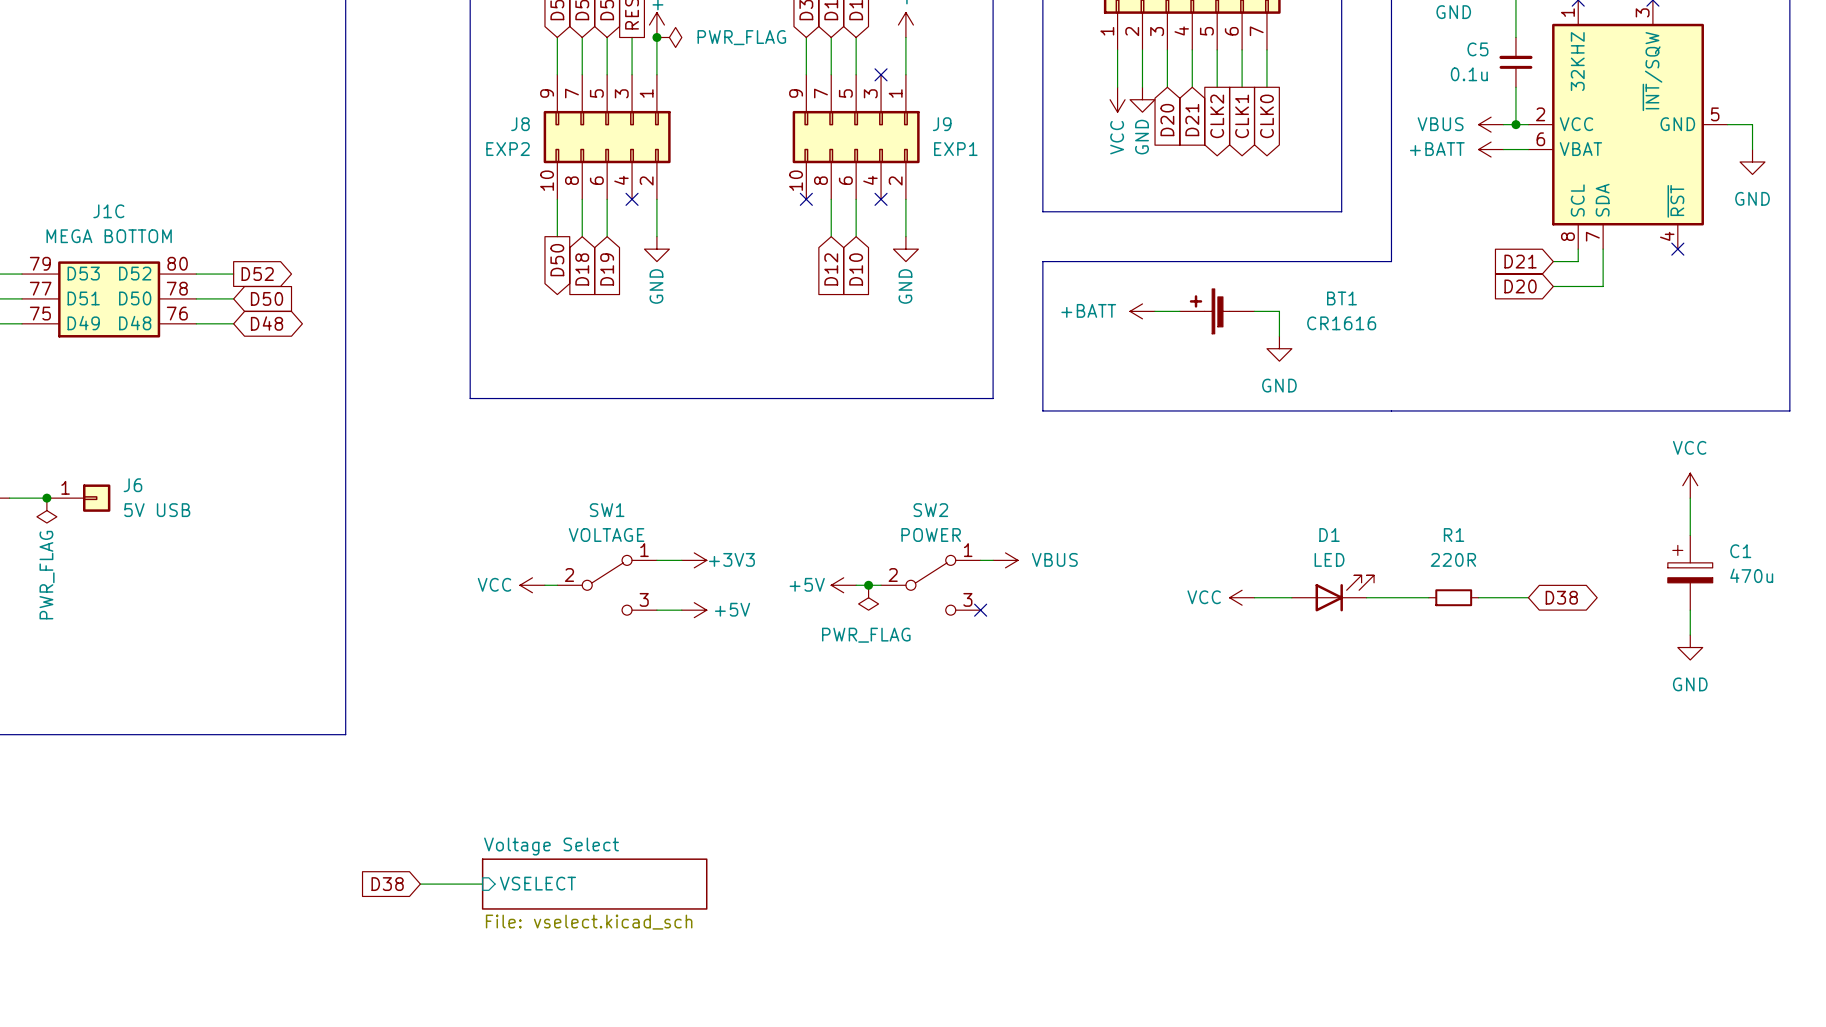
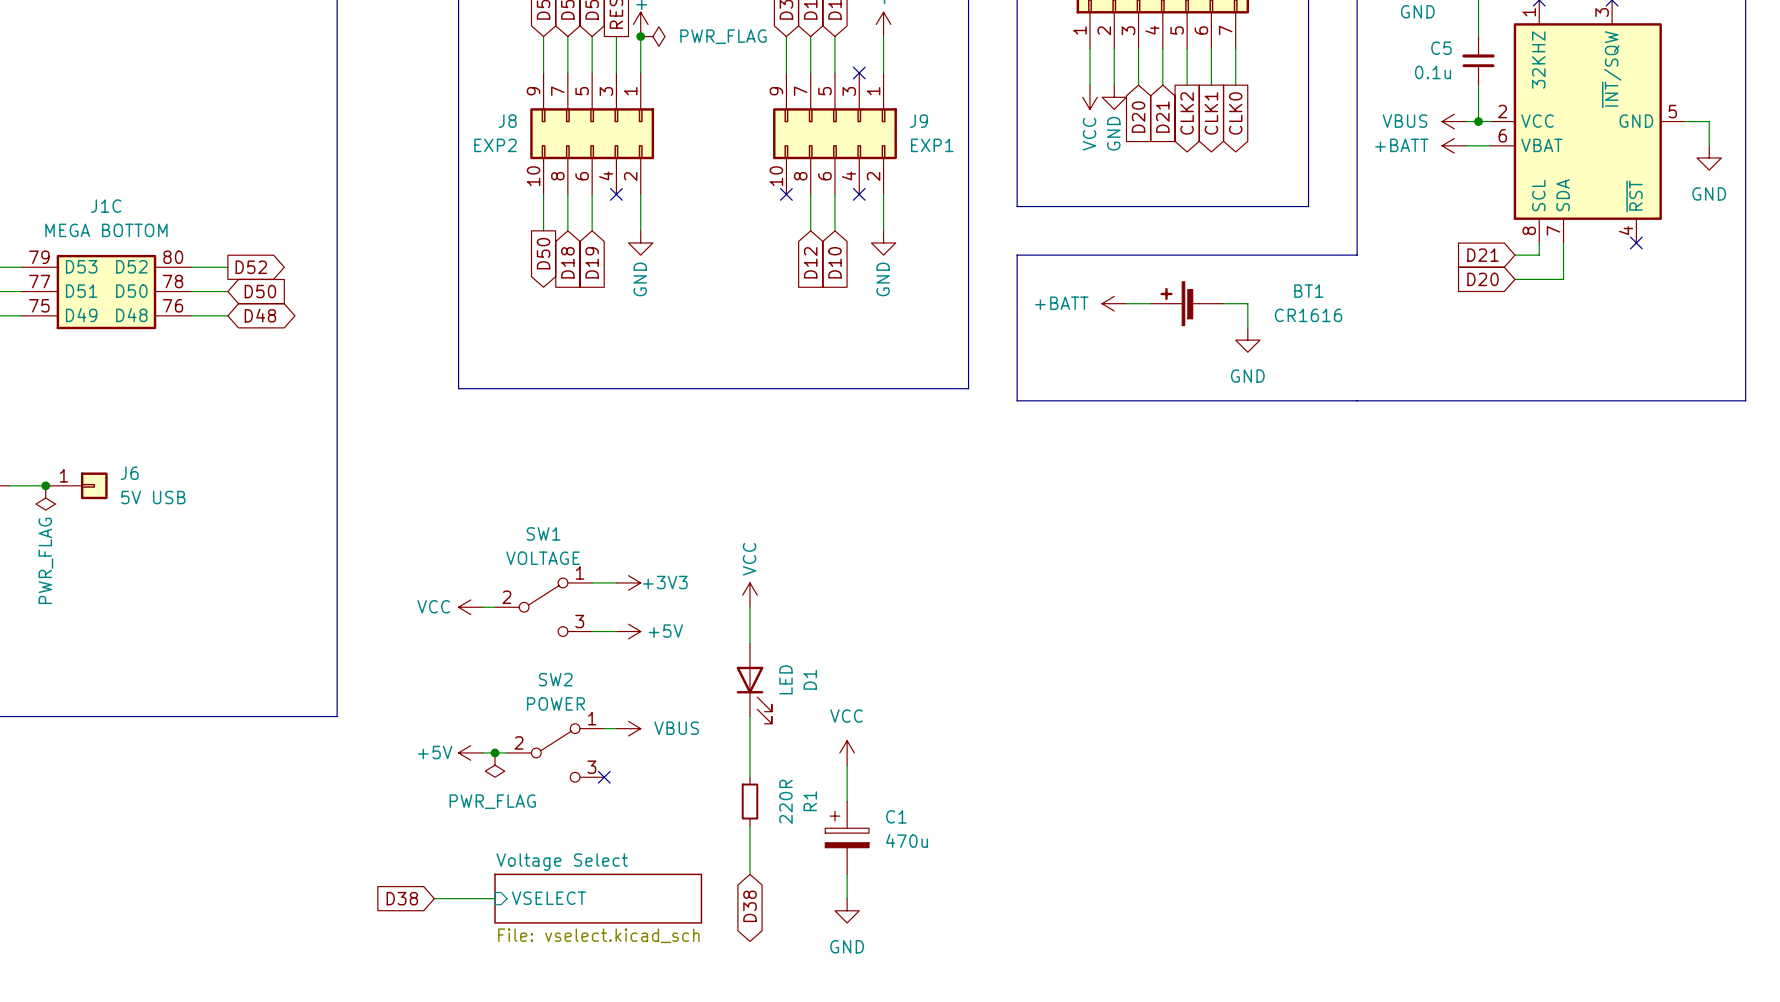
power symbol: VCC (1690, 485) -> none
wire: (1690, 498) (1690, 535) -> none
wire: (656, 560) (681, 560) -> (592, 582) (616, 582)
power symbol position: +3V3 (694, 560) -> +3V3 (628, 582)
wire: (980, 560) (993, 560) -> none
power symbol: VBUS (1005, 560) -> none
C1 position: (1690, 572) -> (847, 837)
power symbol position: VCC (532, 585) -> VCC (470, 607)
wire: (544, 585) (557, 585) -> (482, 607) (495, 607)
SW1 position: (607, 585) -> (543, 607)
power symbol: +5V (843, 585) -> none
wire: (856, 585) (881, 585) -> none
junction: (868, 585) -> none
SW2 position: (930, 585) -> (555, 752)
D1 position: (1332, 593) -> (754, 683)
D1 rotation: 0° (1344, 593) -> 90° clockwise (754, 695)
power symbol: PWR_FLAG (868, 597) -> none
power symbol: VCC (1242, 597) -> none
wire: (1254, 597) (1291, 597) -> none
wire: (1366, 597) (1428, 597) -> none
R1 rotation: 0° (1453, 597) -> 90° clockwise (749, 801)
R1 position: (1453, 597) -> (749, 801)
wire: (1478, 597) (1528, 597) -> none
global label: D38 (1561, 597) -> none
wire: (656, 610) (681, 610) -> (592, 631) (616, 631)
power symbol position: +5V (694, 610) -> +5V (628, 631)
power symbol: none -> VCC (749, 595)
no-connect mark: (980, 610) -> none
wire: (1690, 610) (1690, 635) -> none
wire: none -> (749, 607) (749, 643)
power symbol: GND (1690, 647) -> none
wire: none -> (749, 716) (749, 777)
wire: none -> (604, 728) (616, 728)
power symbol: none -> VBUS (628, 728)
power symbol: none -> +5V (470, 752)
wire: none -> (482, 752) (507, 752)
junction: none -> (495, 752)
power symbol: none -> VCC (847, 752)
power symbol: none -> PWR_FLAG (495, 765)
wire: none -> (847, 765) (847, 801)
no-connect mark: none -> (604, 777)
wire: none -> (749, 825) (749, 874)
sheet pin position: VSELECT (537, 883) -> VSELECT (548, 898)
global label position: D38 (387, 884) -> D38 (402, 898)
wire: (420, 884) (482, 884) -> (434, 898) (495, 898)
sheet Voltage Select: File: vselect.kicad_sch (594, 884) -> none
wire: none -> (847, 874) (847, 898)
sheet Voltage Select: none -> File: vselect.kicad_sch (598, 898)
global label: none -> D38 (749, 906)
power symbol: none -> GND (847, 910)

